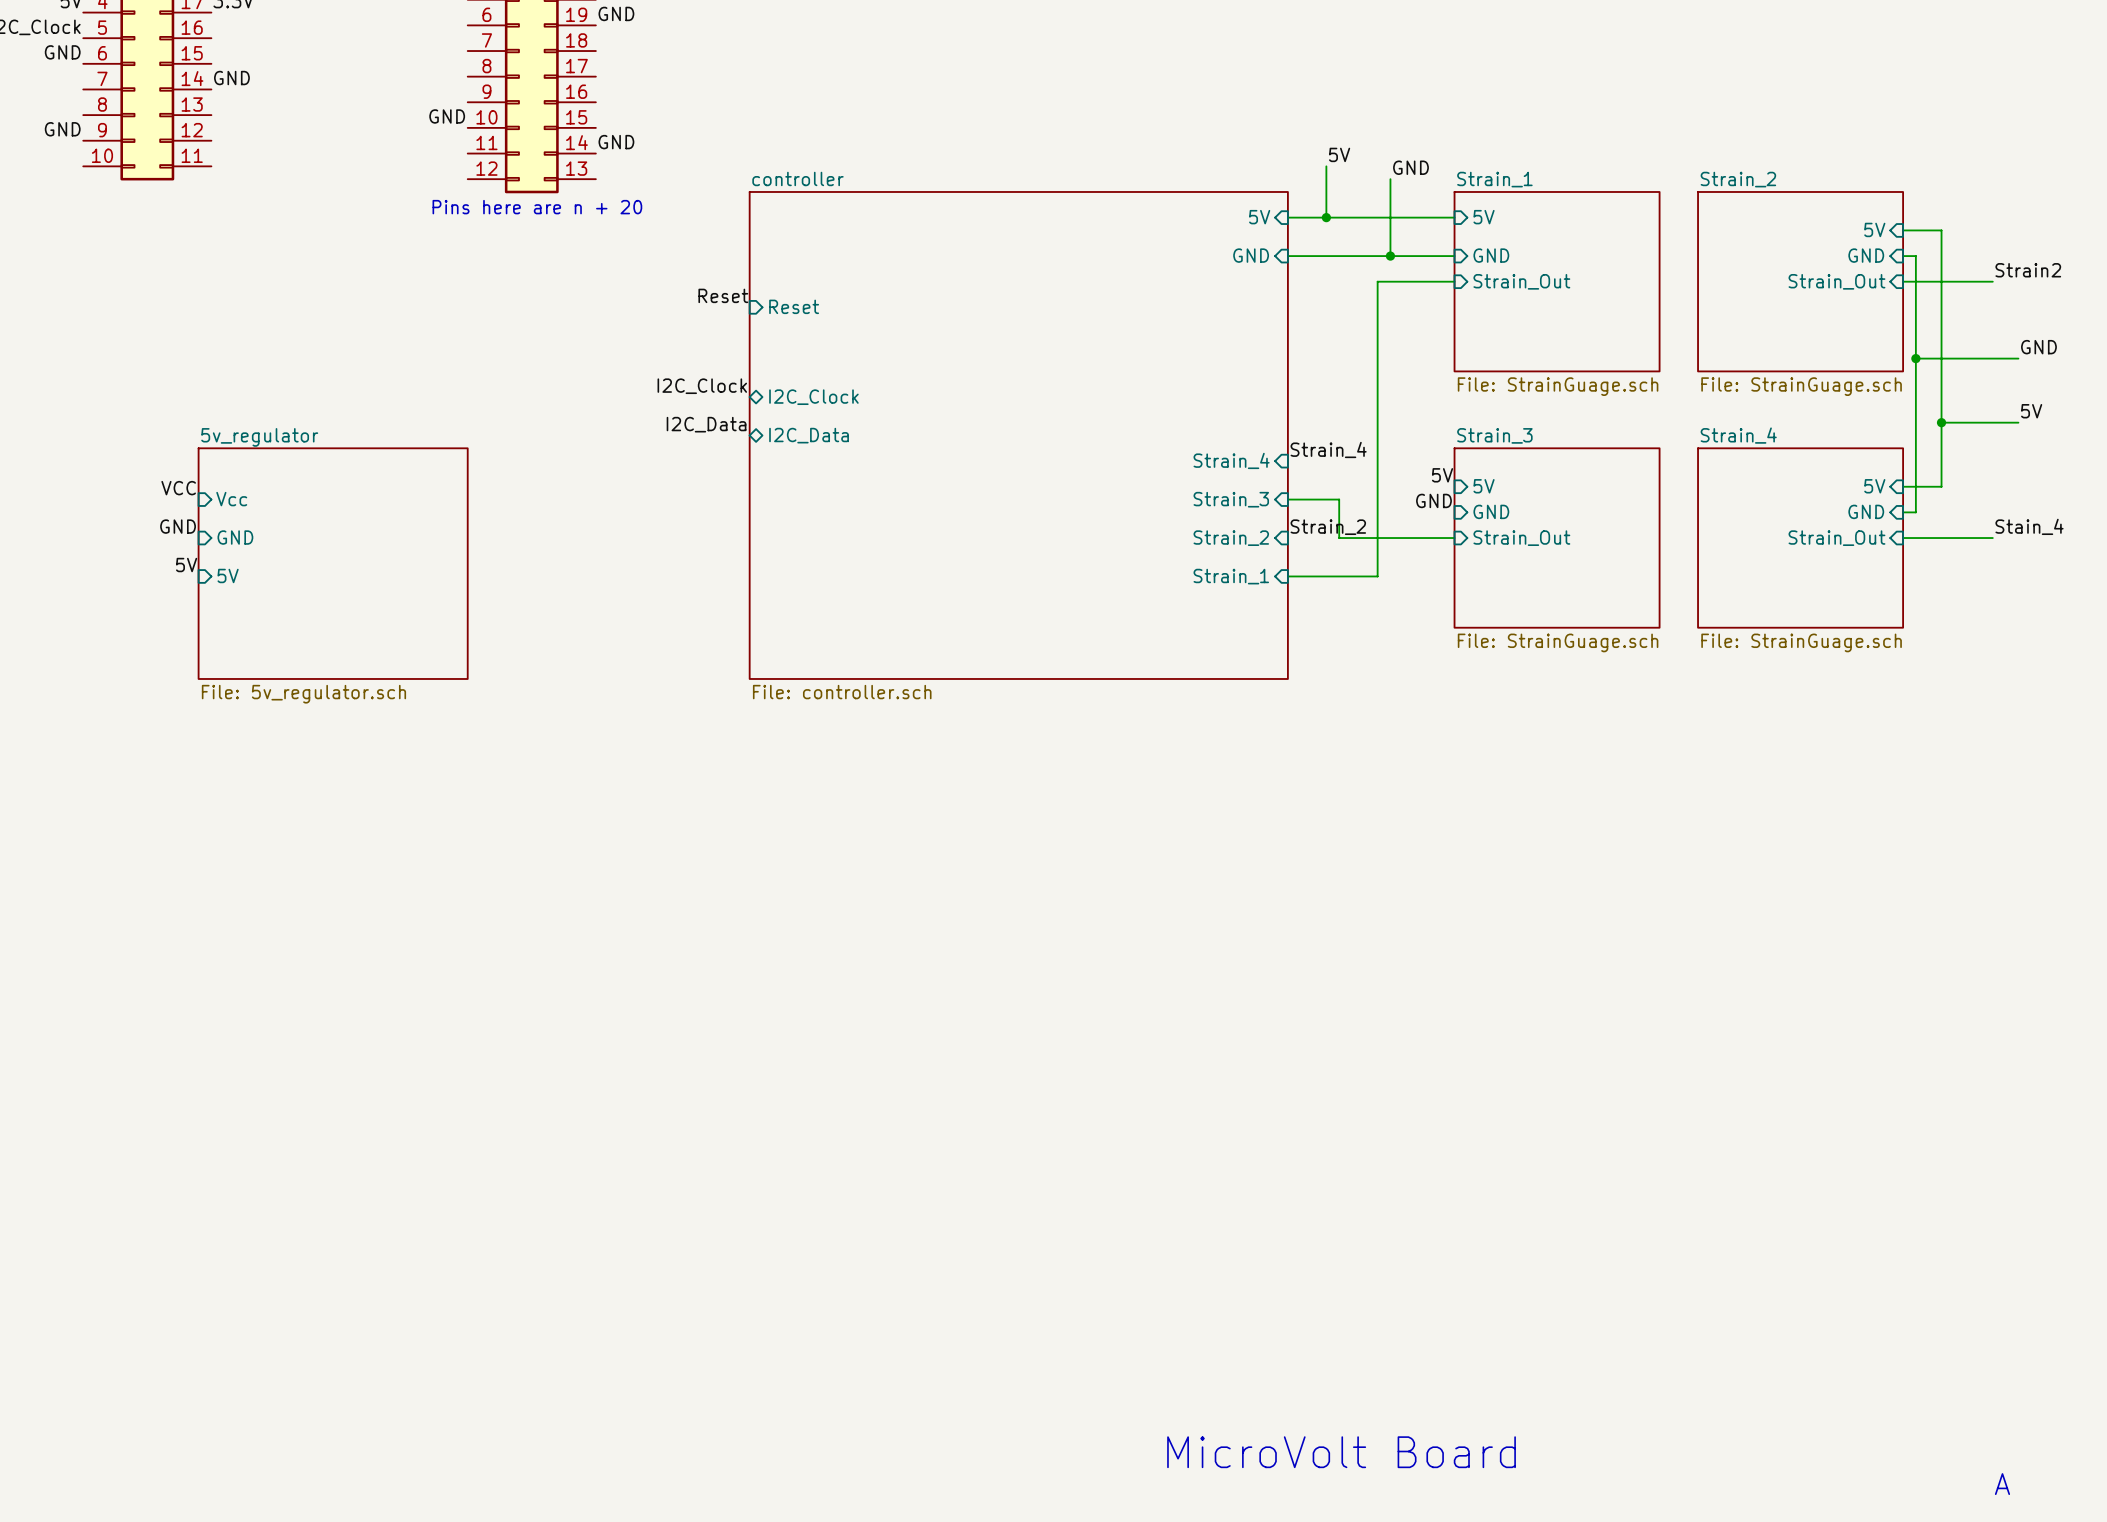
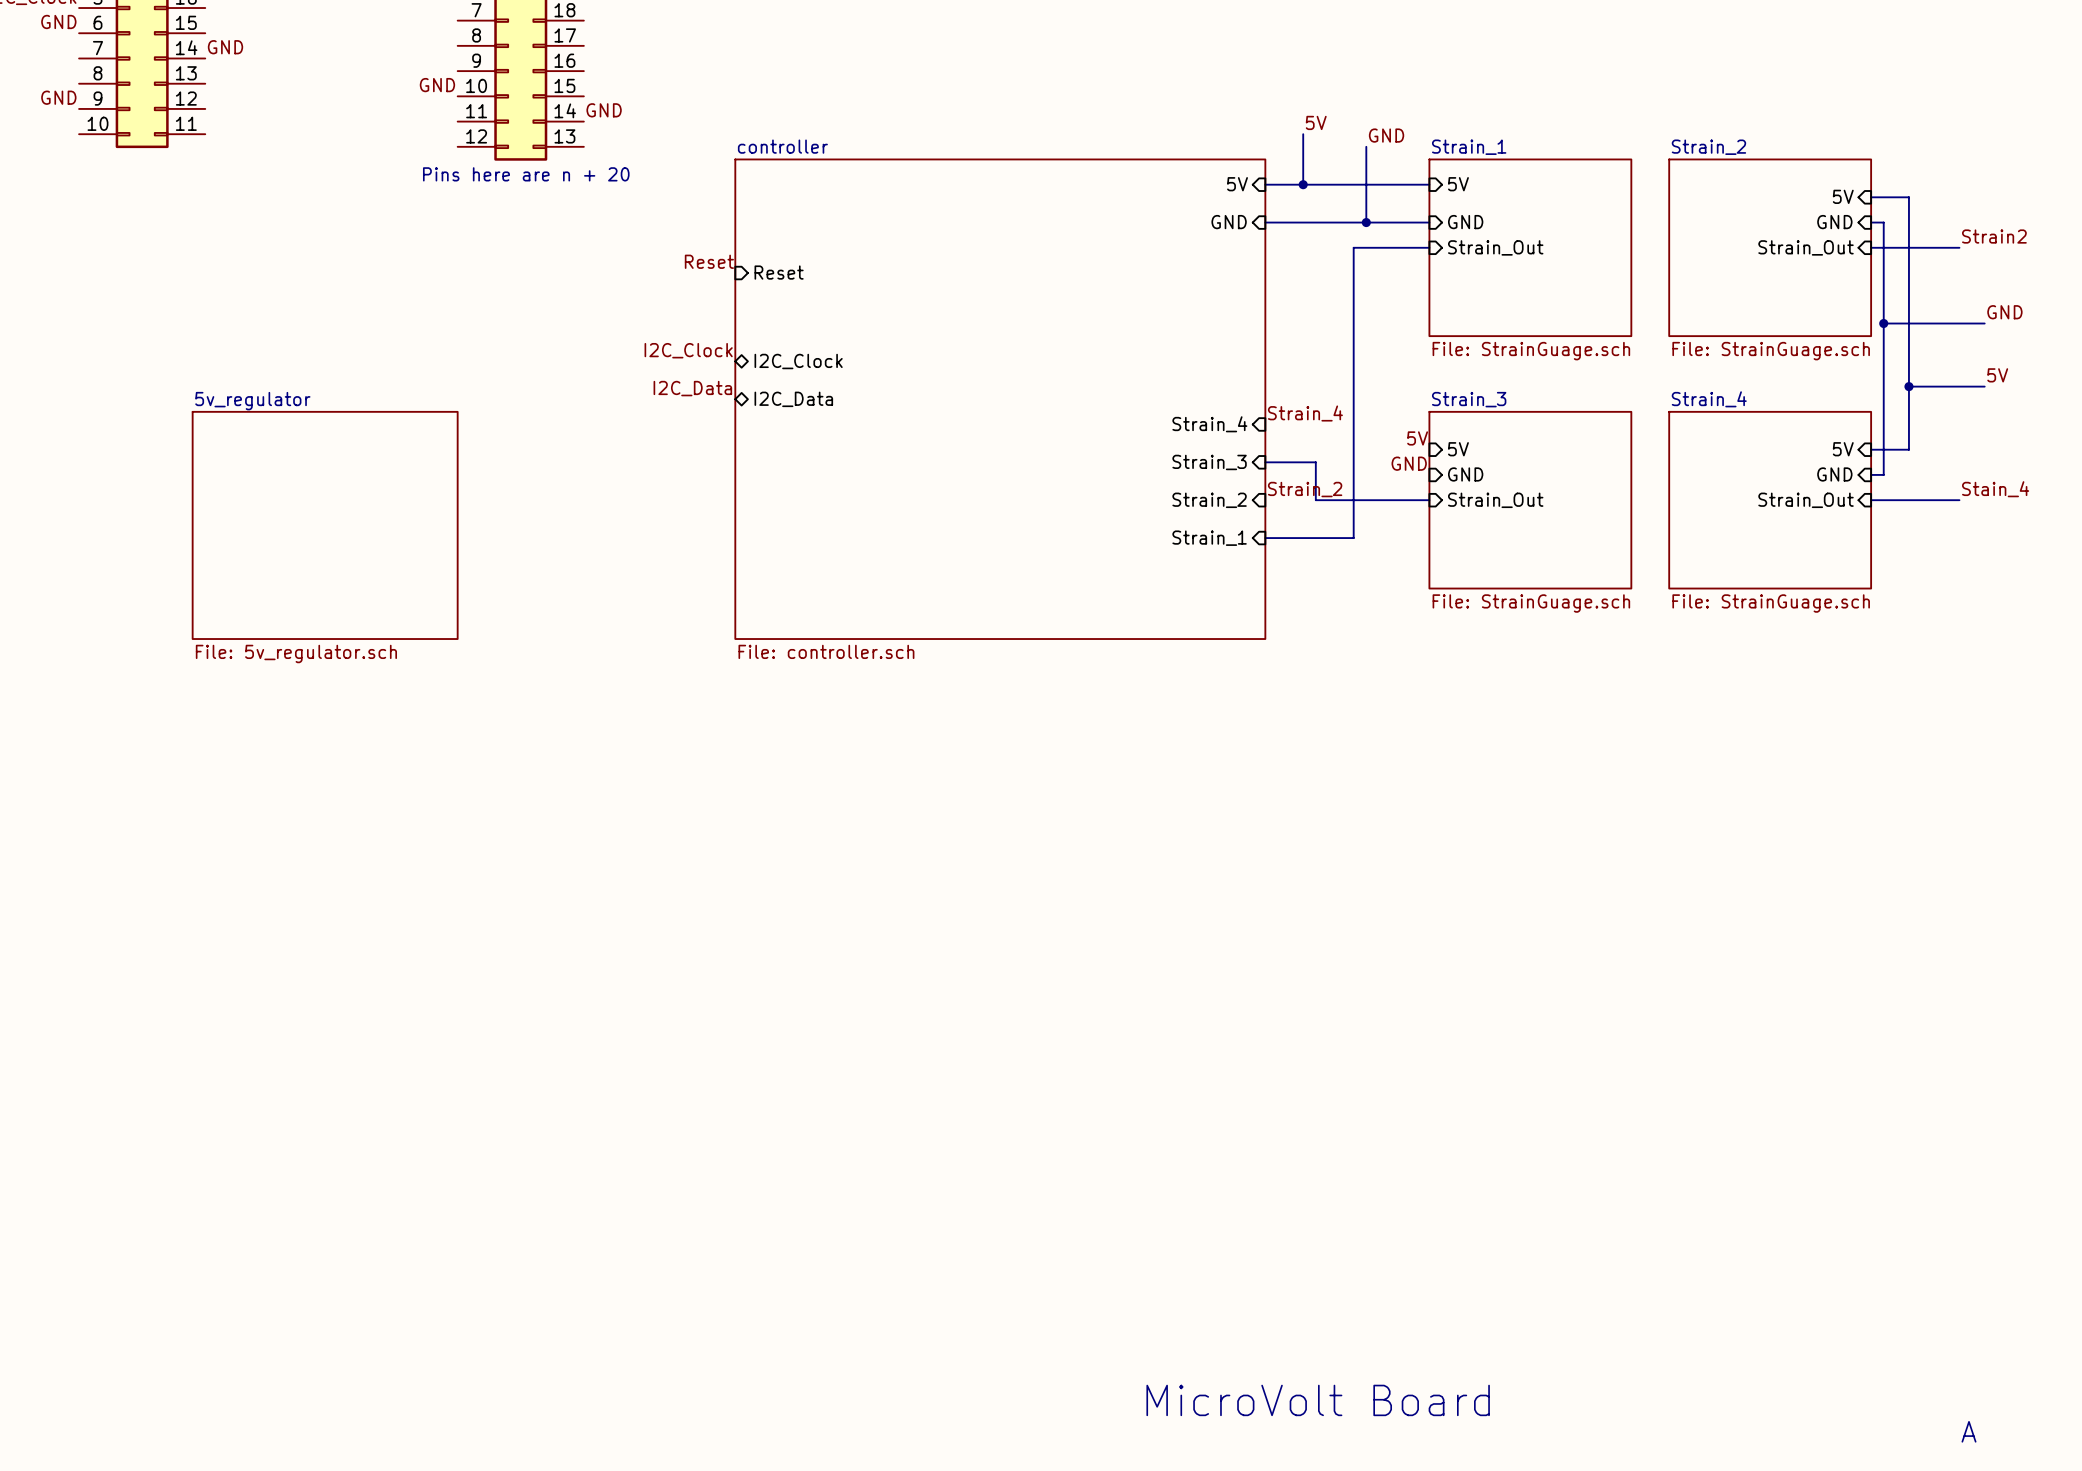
label: VCC (178, 488) -> none
sheet pin: Vcc (231, 499) -> none
label: GND (178, 526) -> none
sheet pin: GND (235, 537) -> none
label: 5V (186, 565) -> none
sheet pin: 5V (228, 575) -> none

